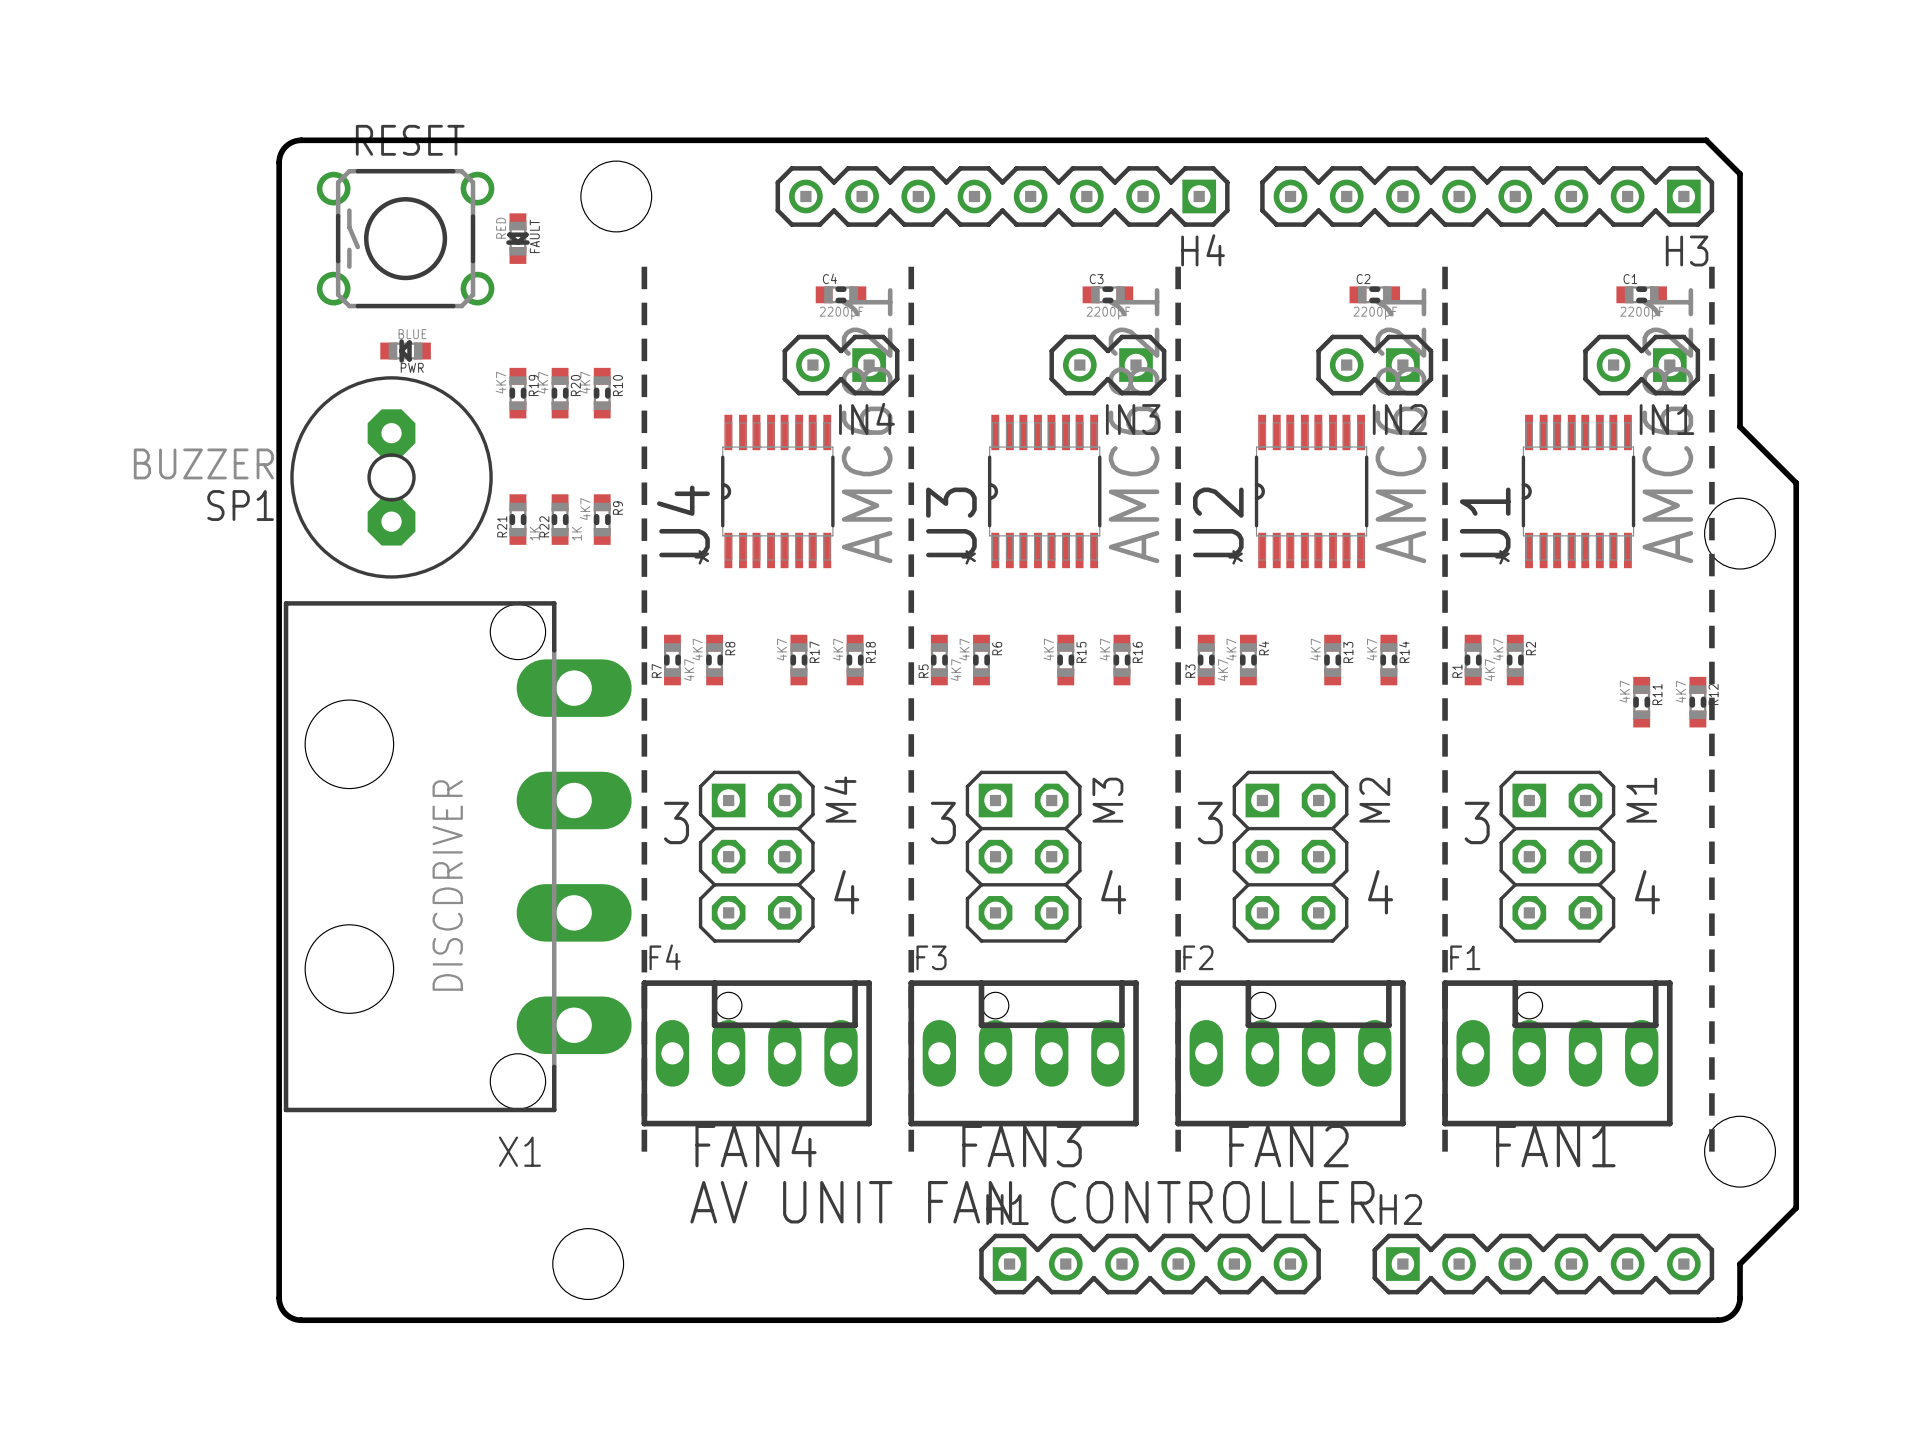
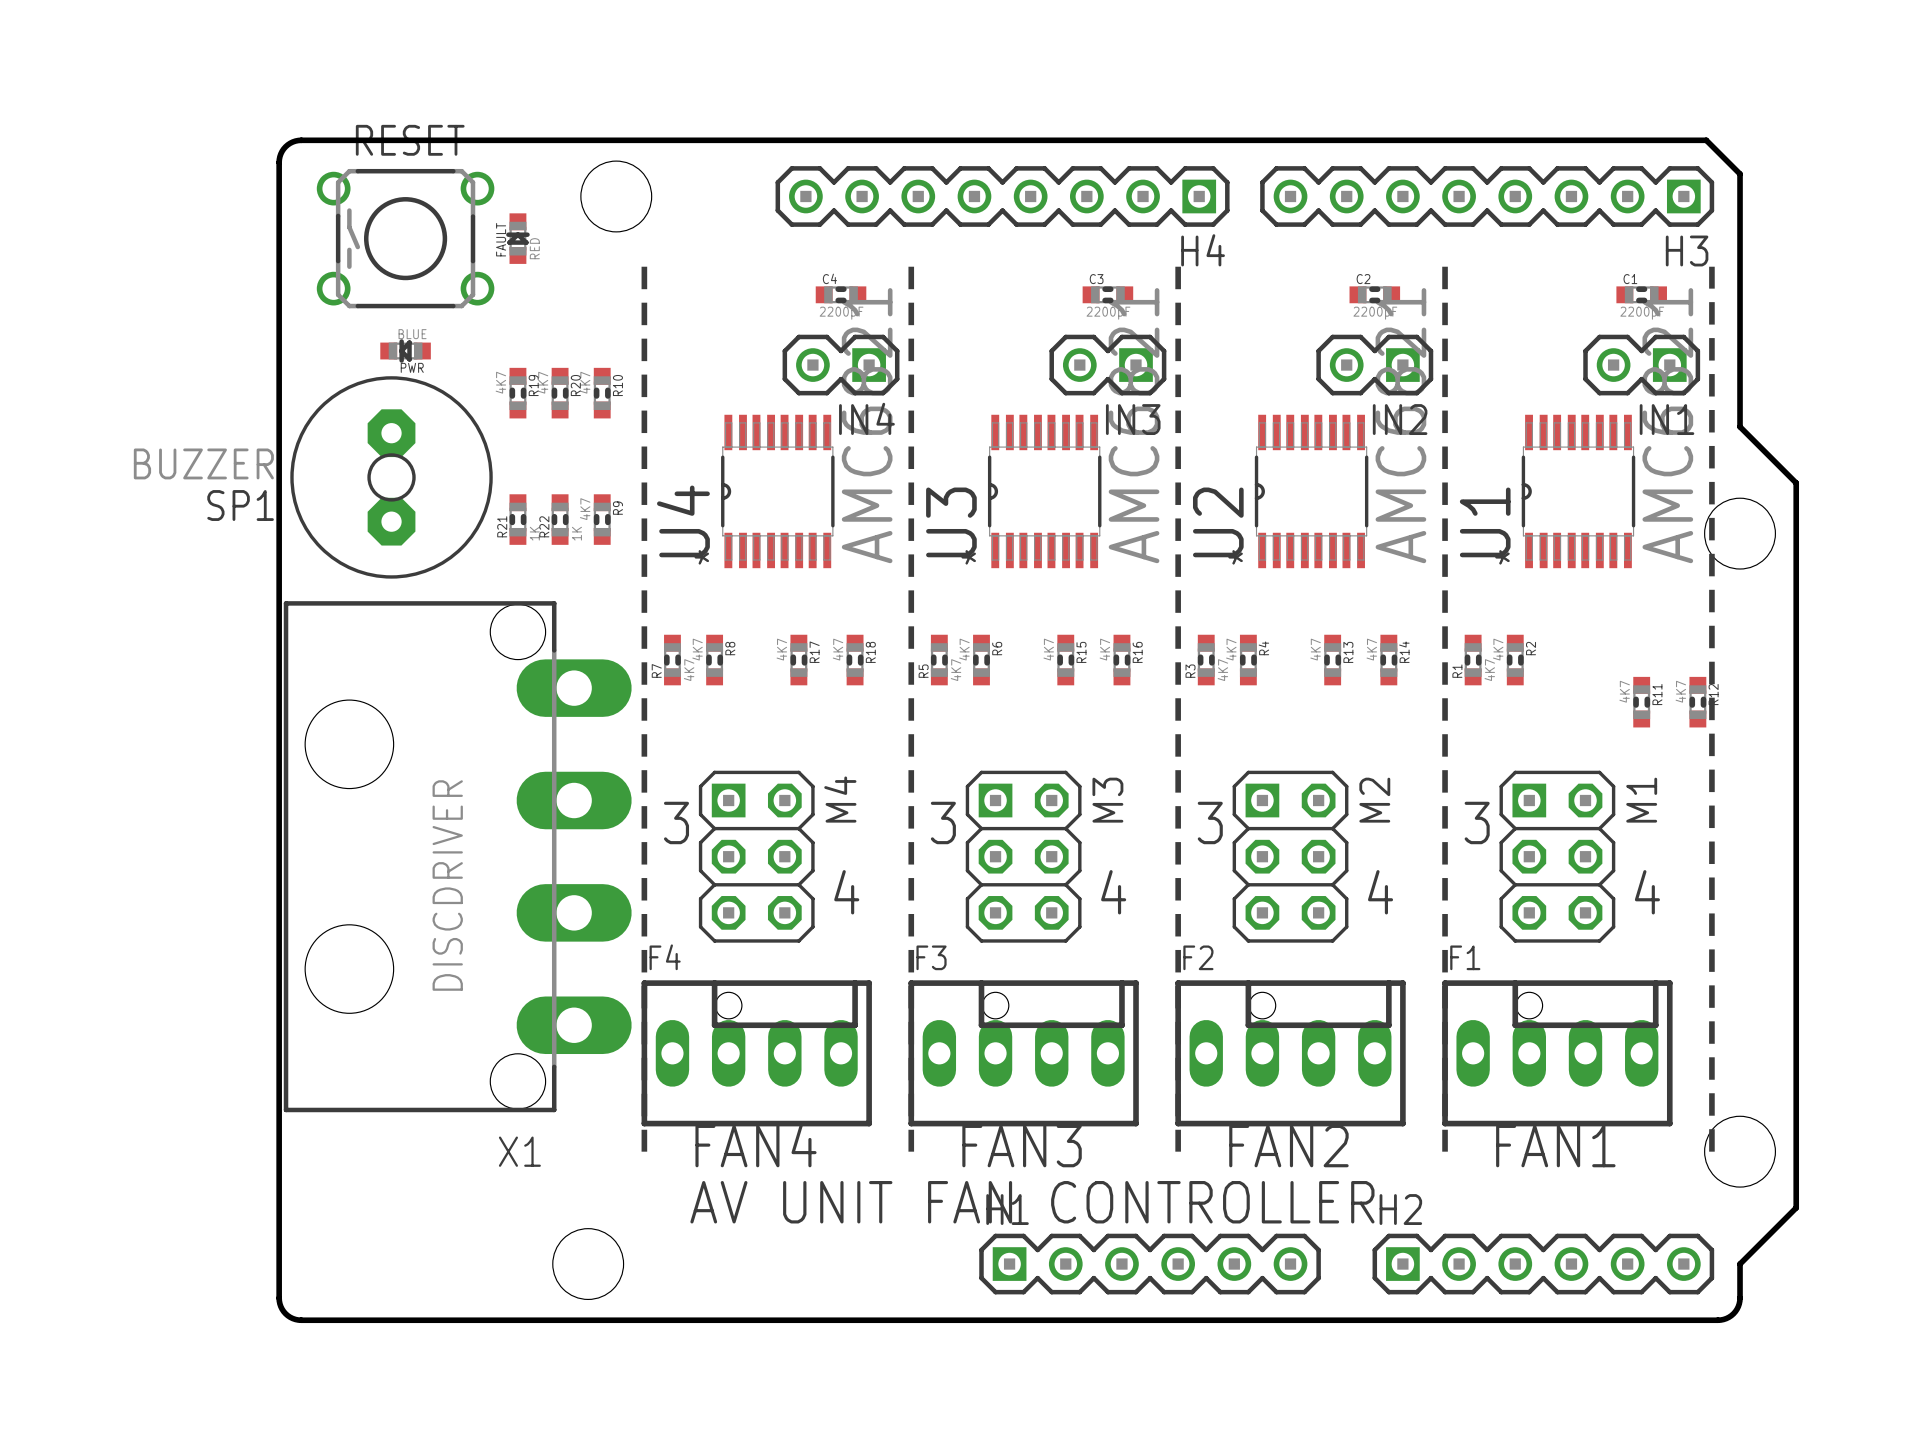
FAULT rotation: 0° (517, 238) -> 180° (517, 238)

